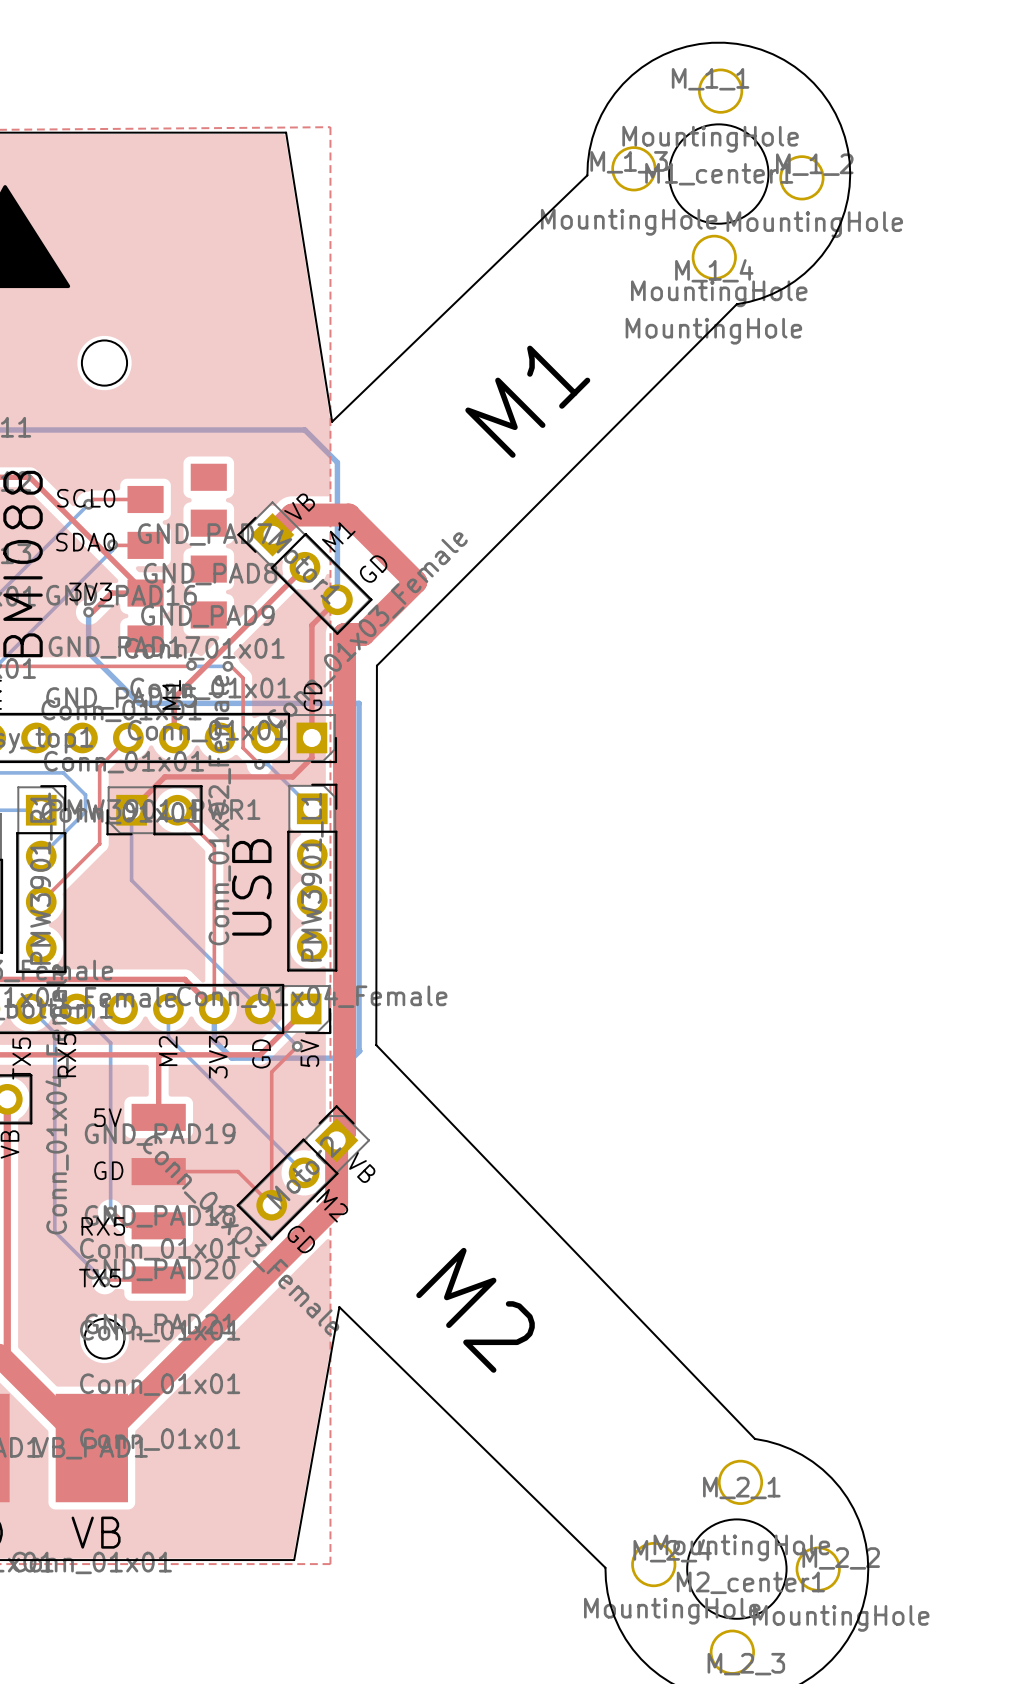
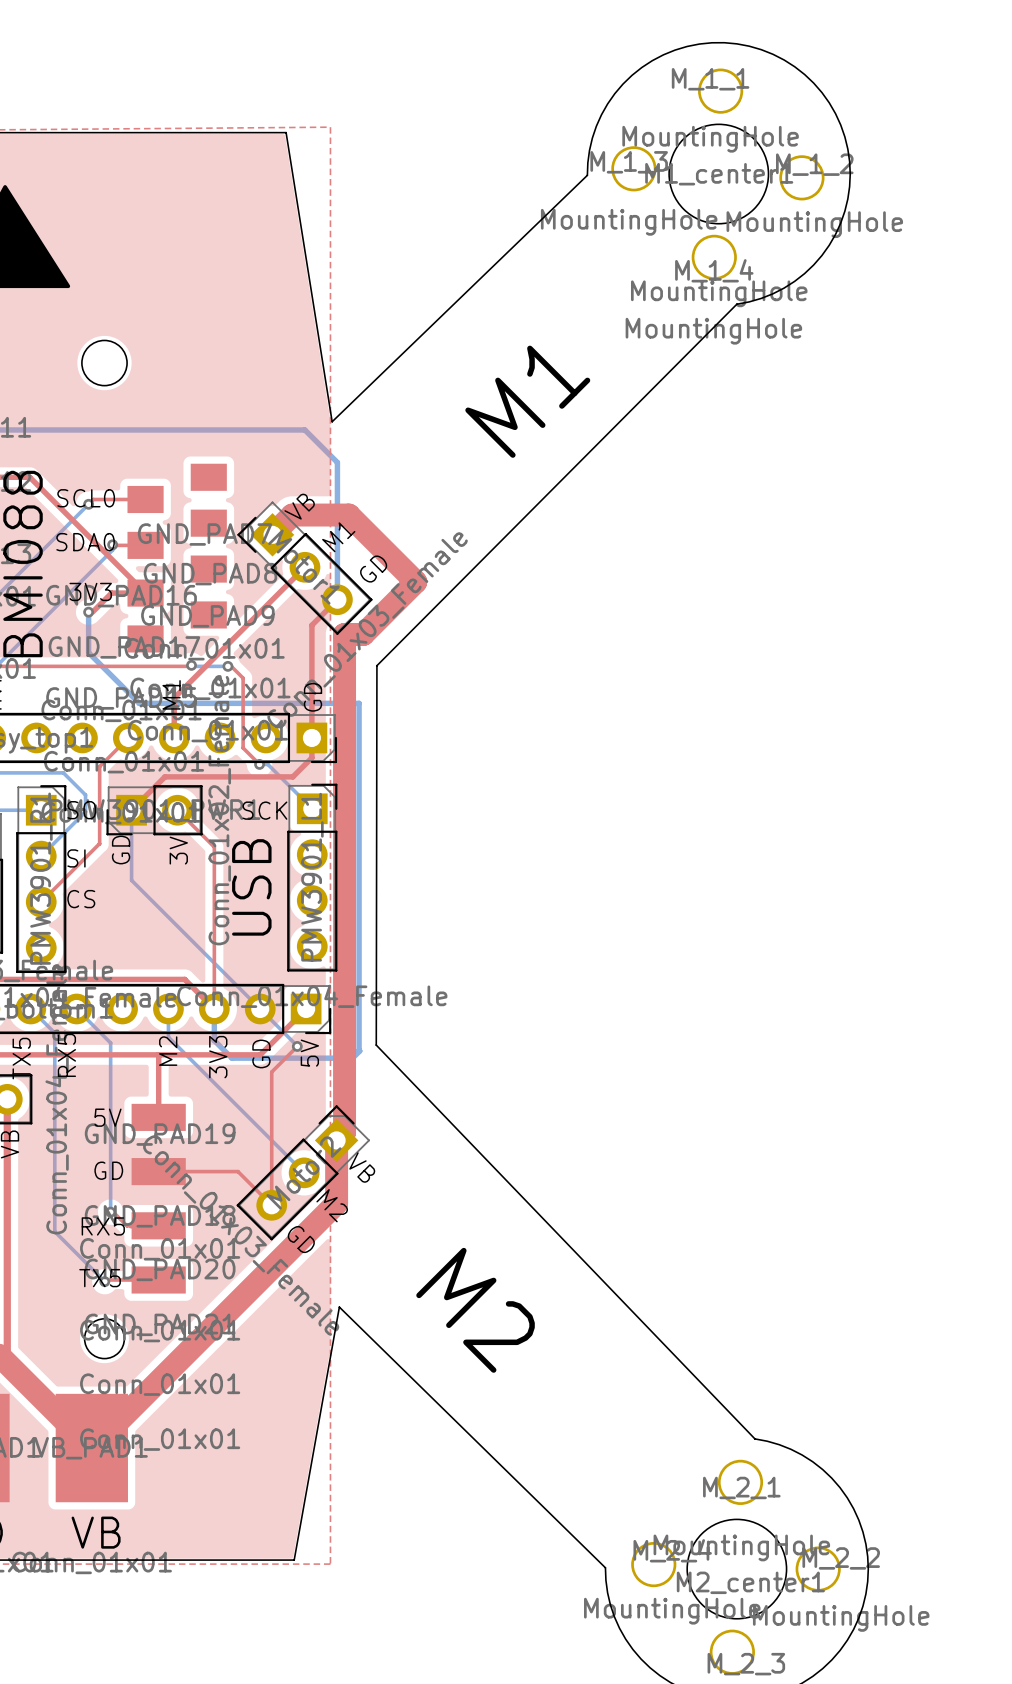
text: none -> SO (81, 810)
text: none -> SCK (264, 810)
text: none -> GD (121, 849)
text: none -> 3V (178, 850)
text: none -> SI (76, 858)
text: none -> CS (81, 899)

